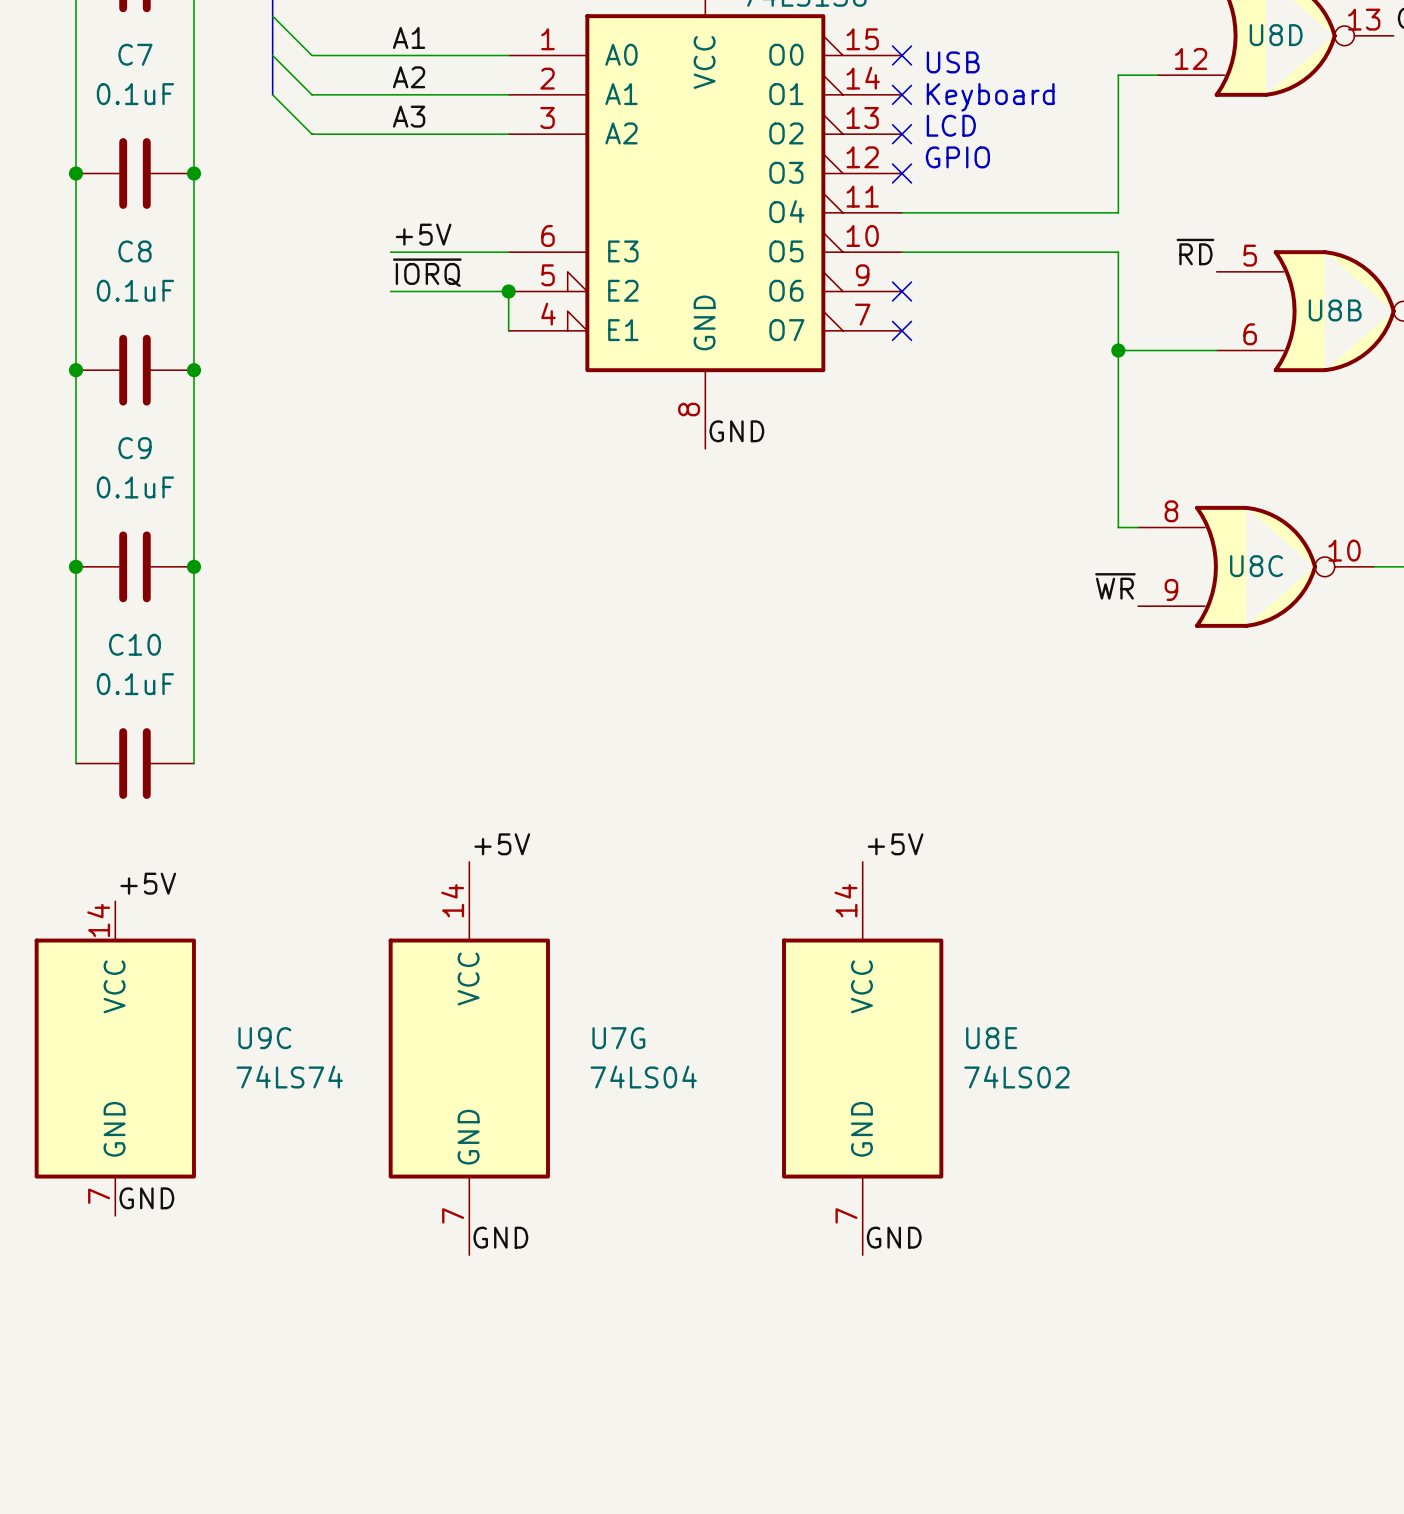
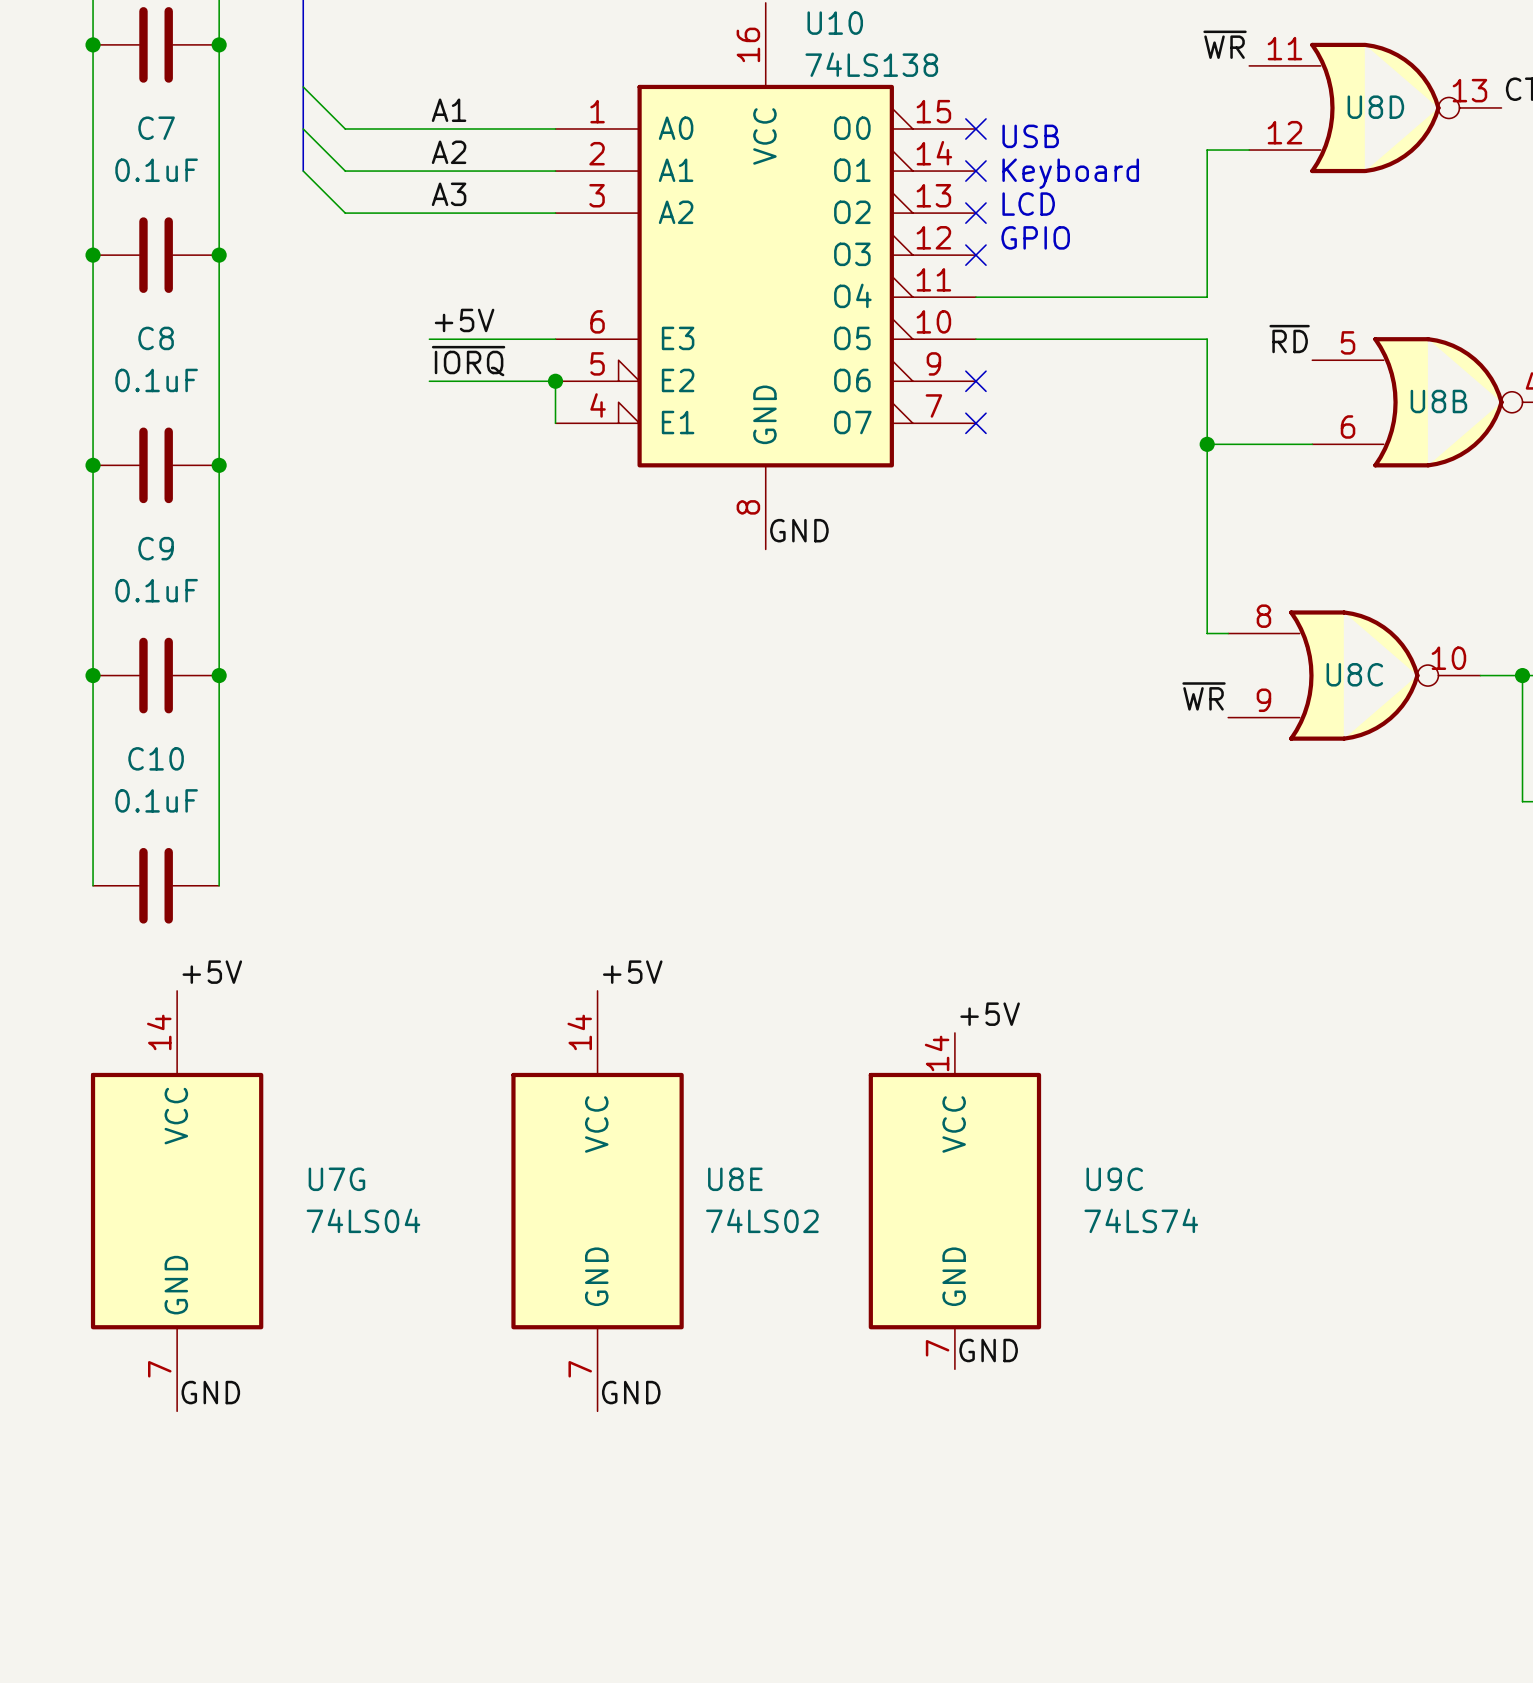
label position: +5V (502, 844) -> +5V (632, 972)
label position: +5V (895, 844) -> +5V (990, 1014)
label position: +5V (148, 883) -> +5V (212, 972)
U9C position: (115, 1058) -> (954, 1201)
U7G position: (469, 1058) -> (177, 1201)
U8E position: (862, 1058) -> (597, 1201)
label position: GND (146, 1198) -> GND (210, 1392)
label position: GND (500, 1237) -> GND (631, 1392)
label position: GND (894, 1237) -> GND (988, 1350)

